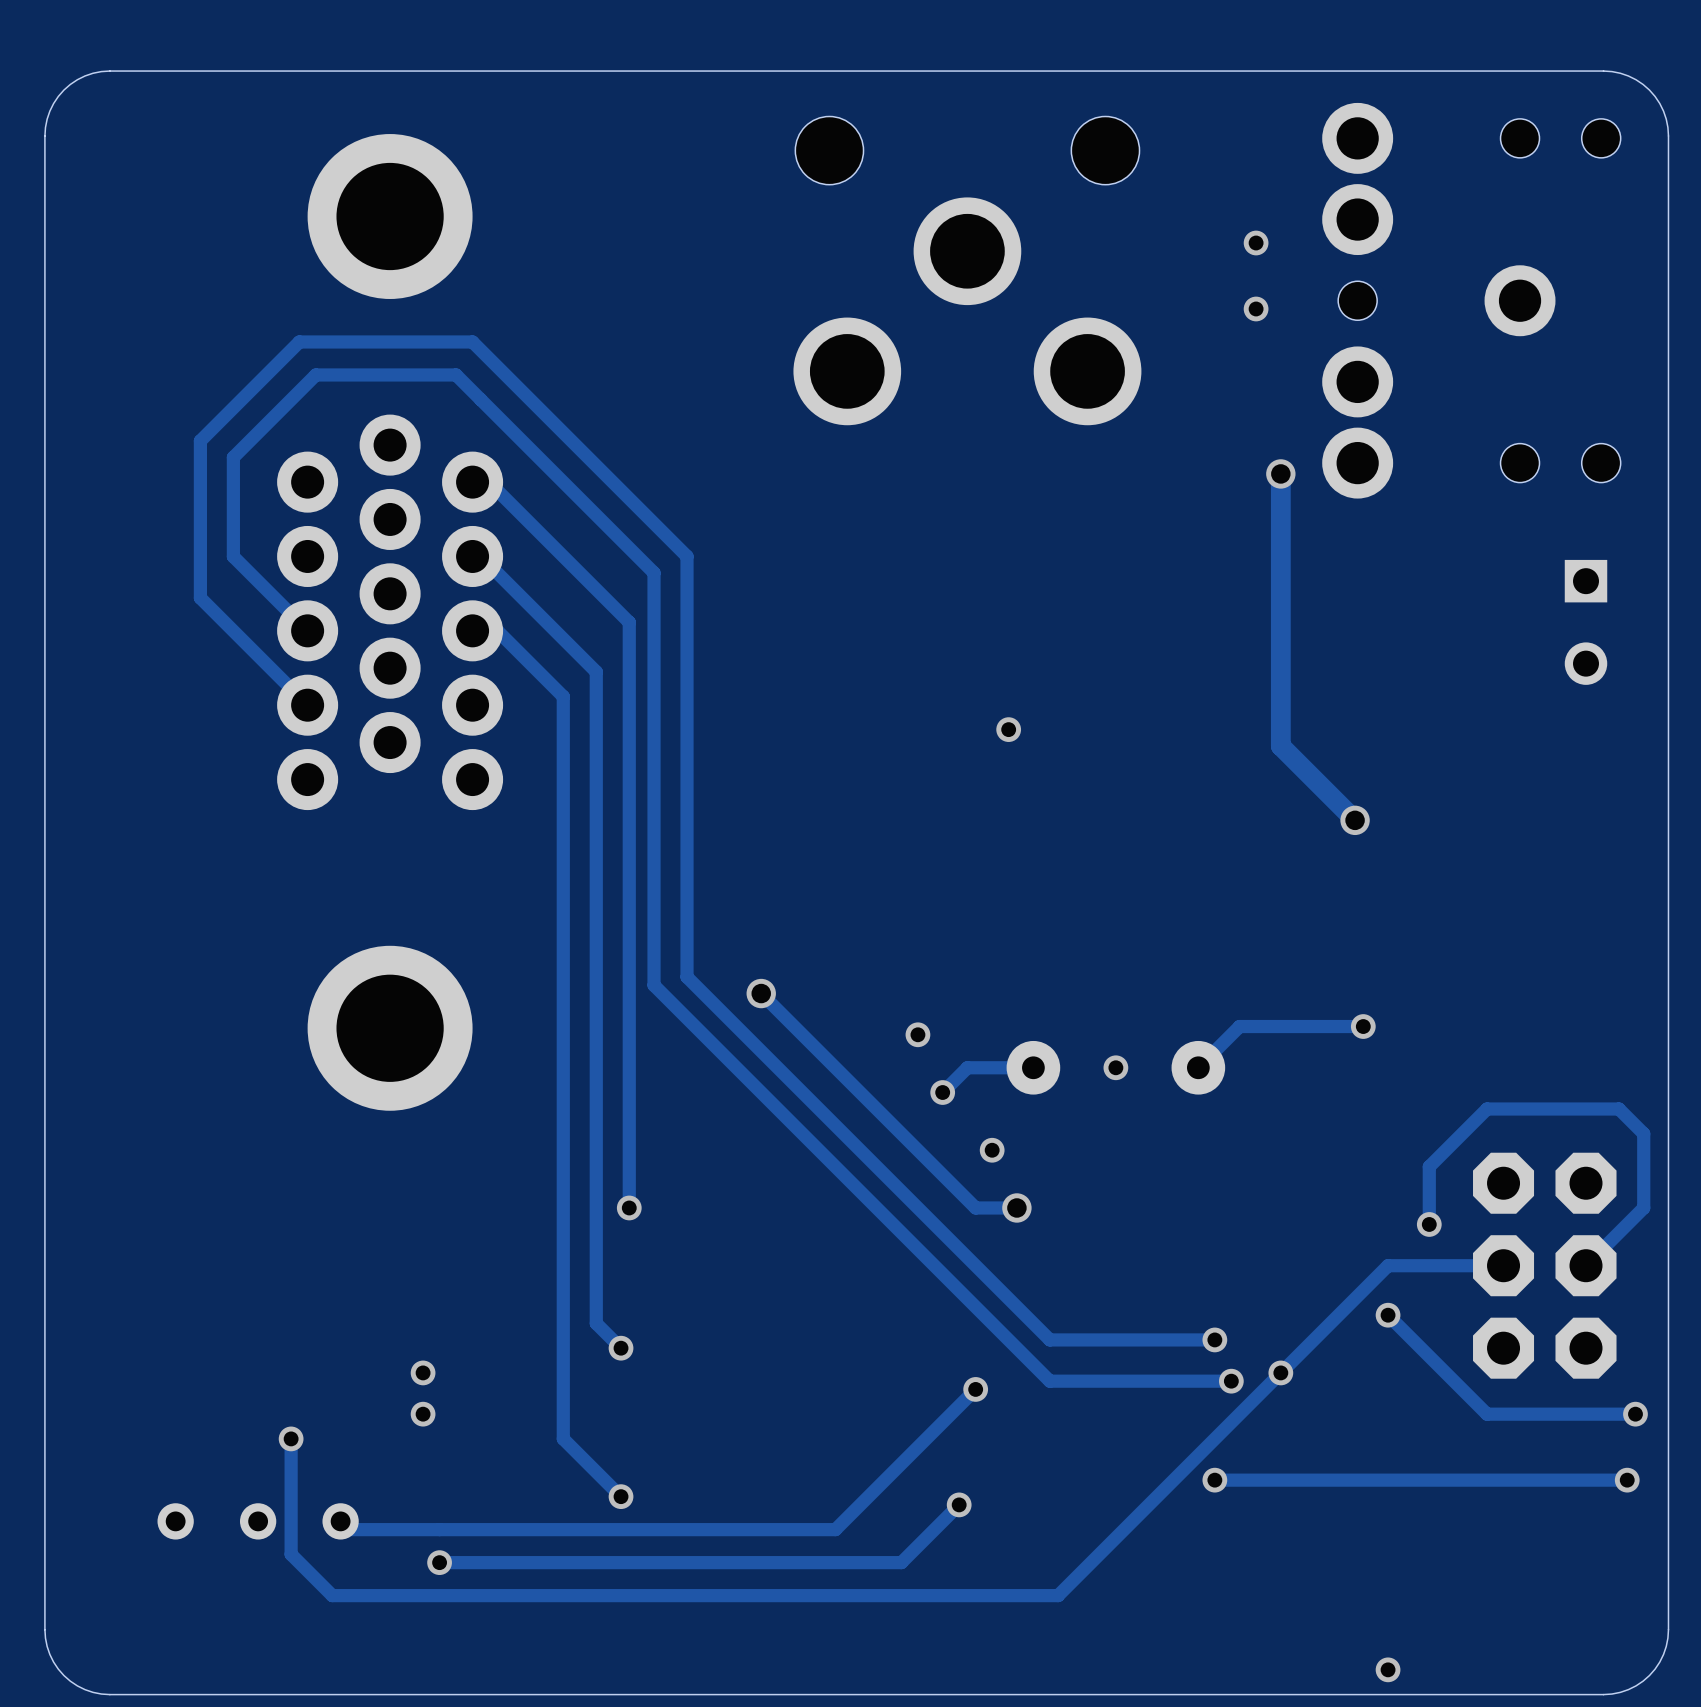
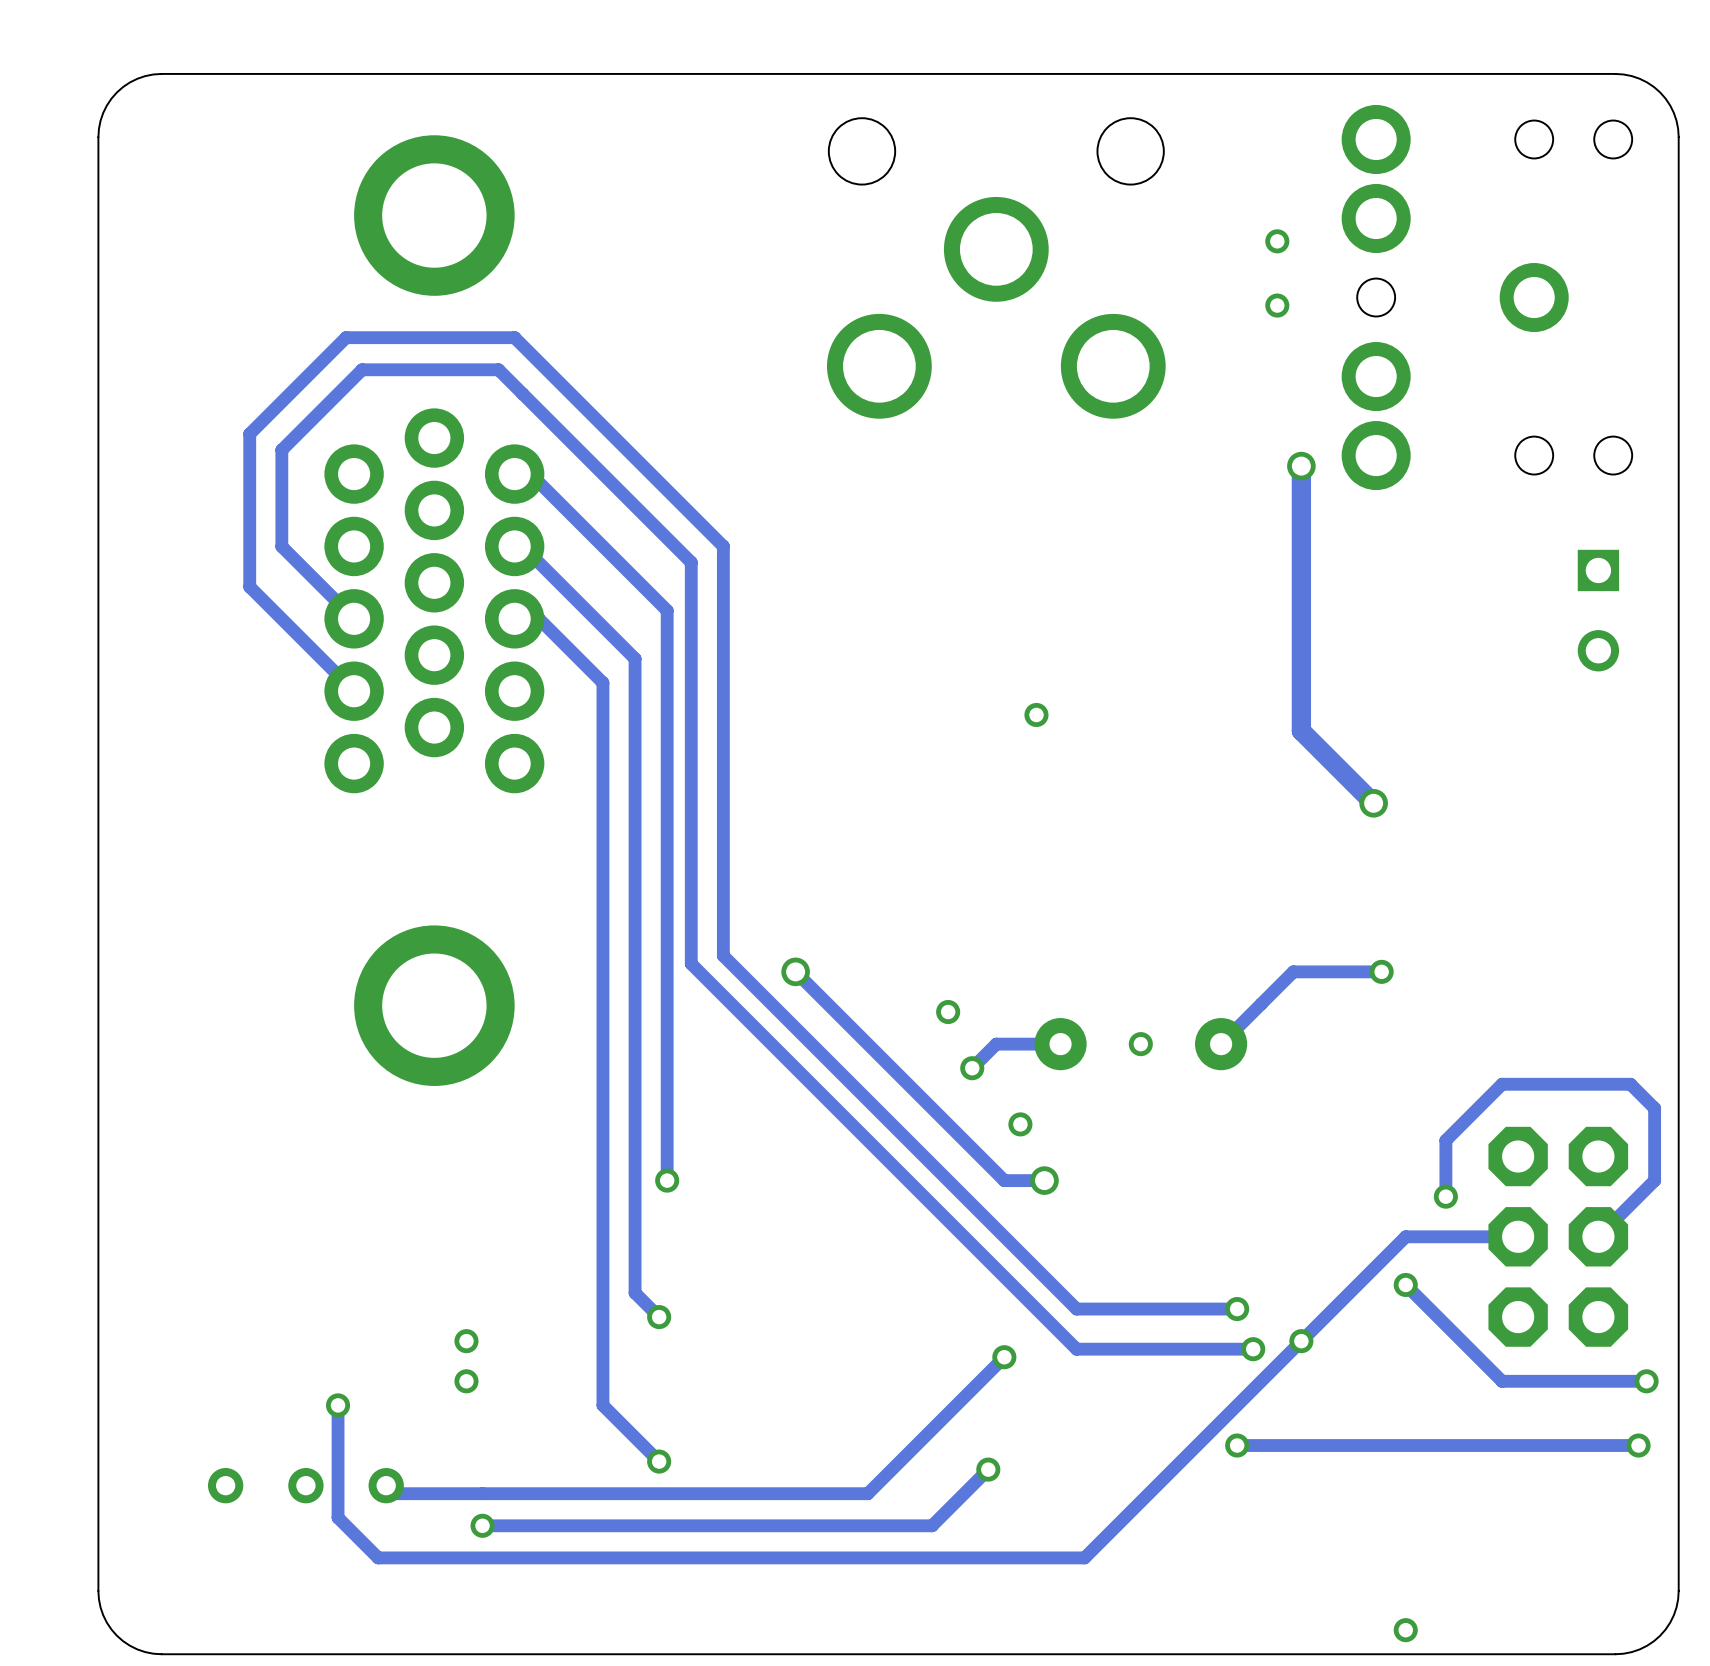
track: (1363, 1026) (1239, 1026) -> (1381, 971) (1293, 971) (1261, 1003)
via position: (1363, 1026) -> (1381, 971)

